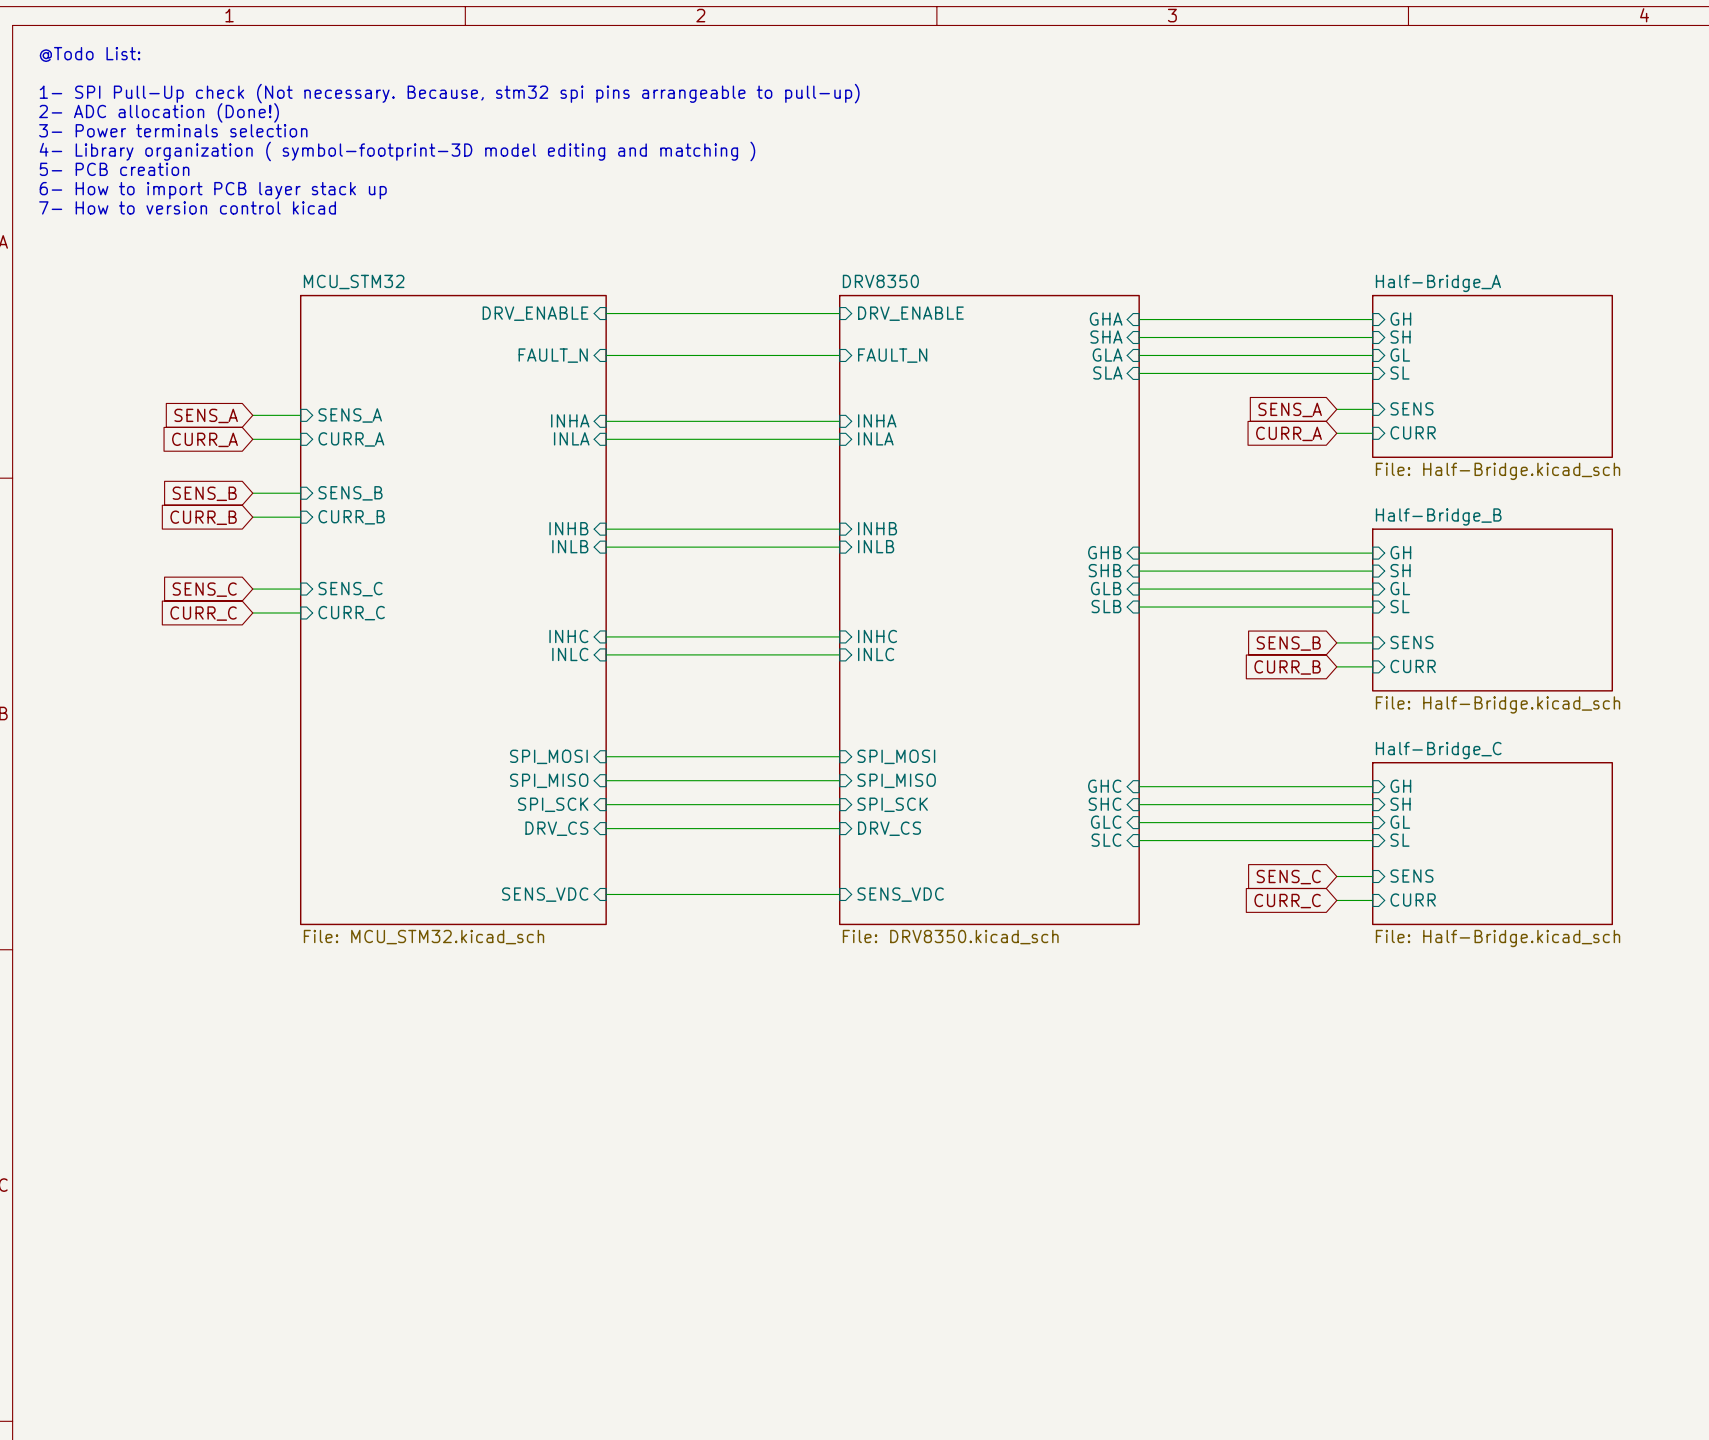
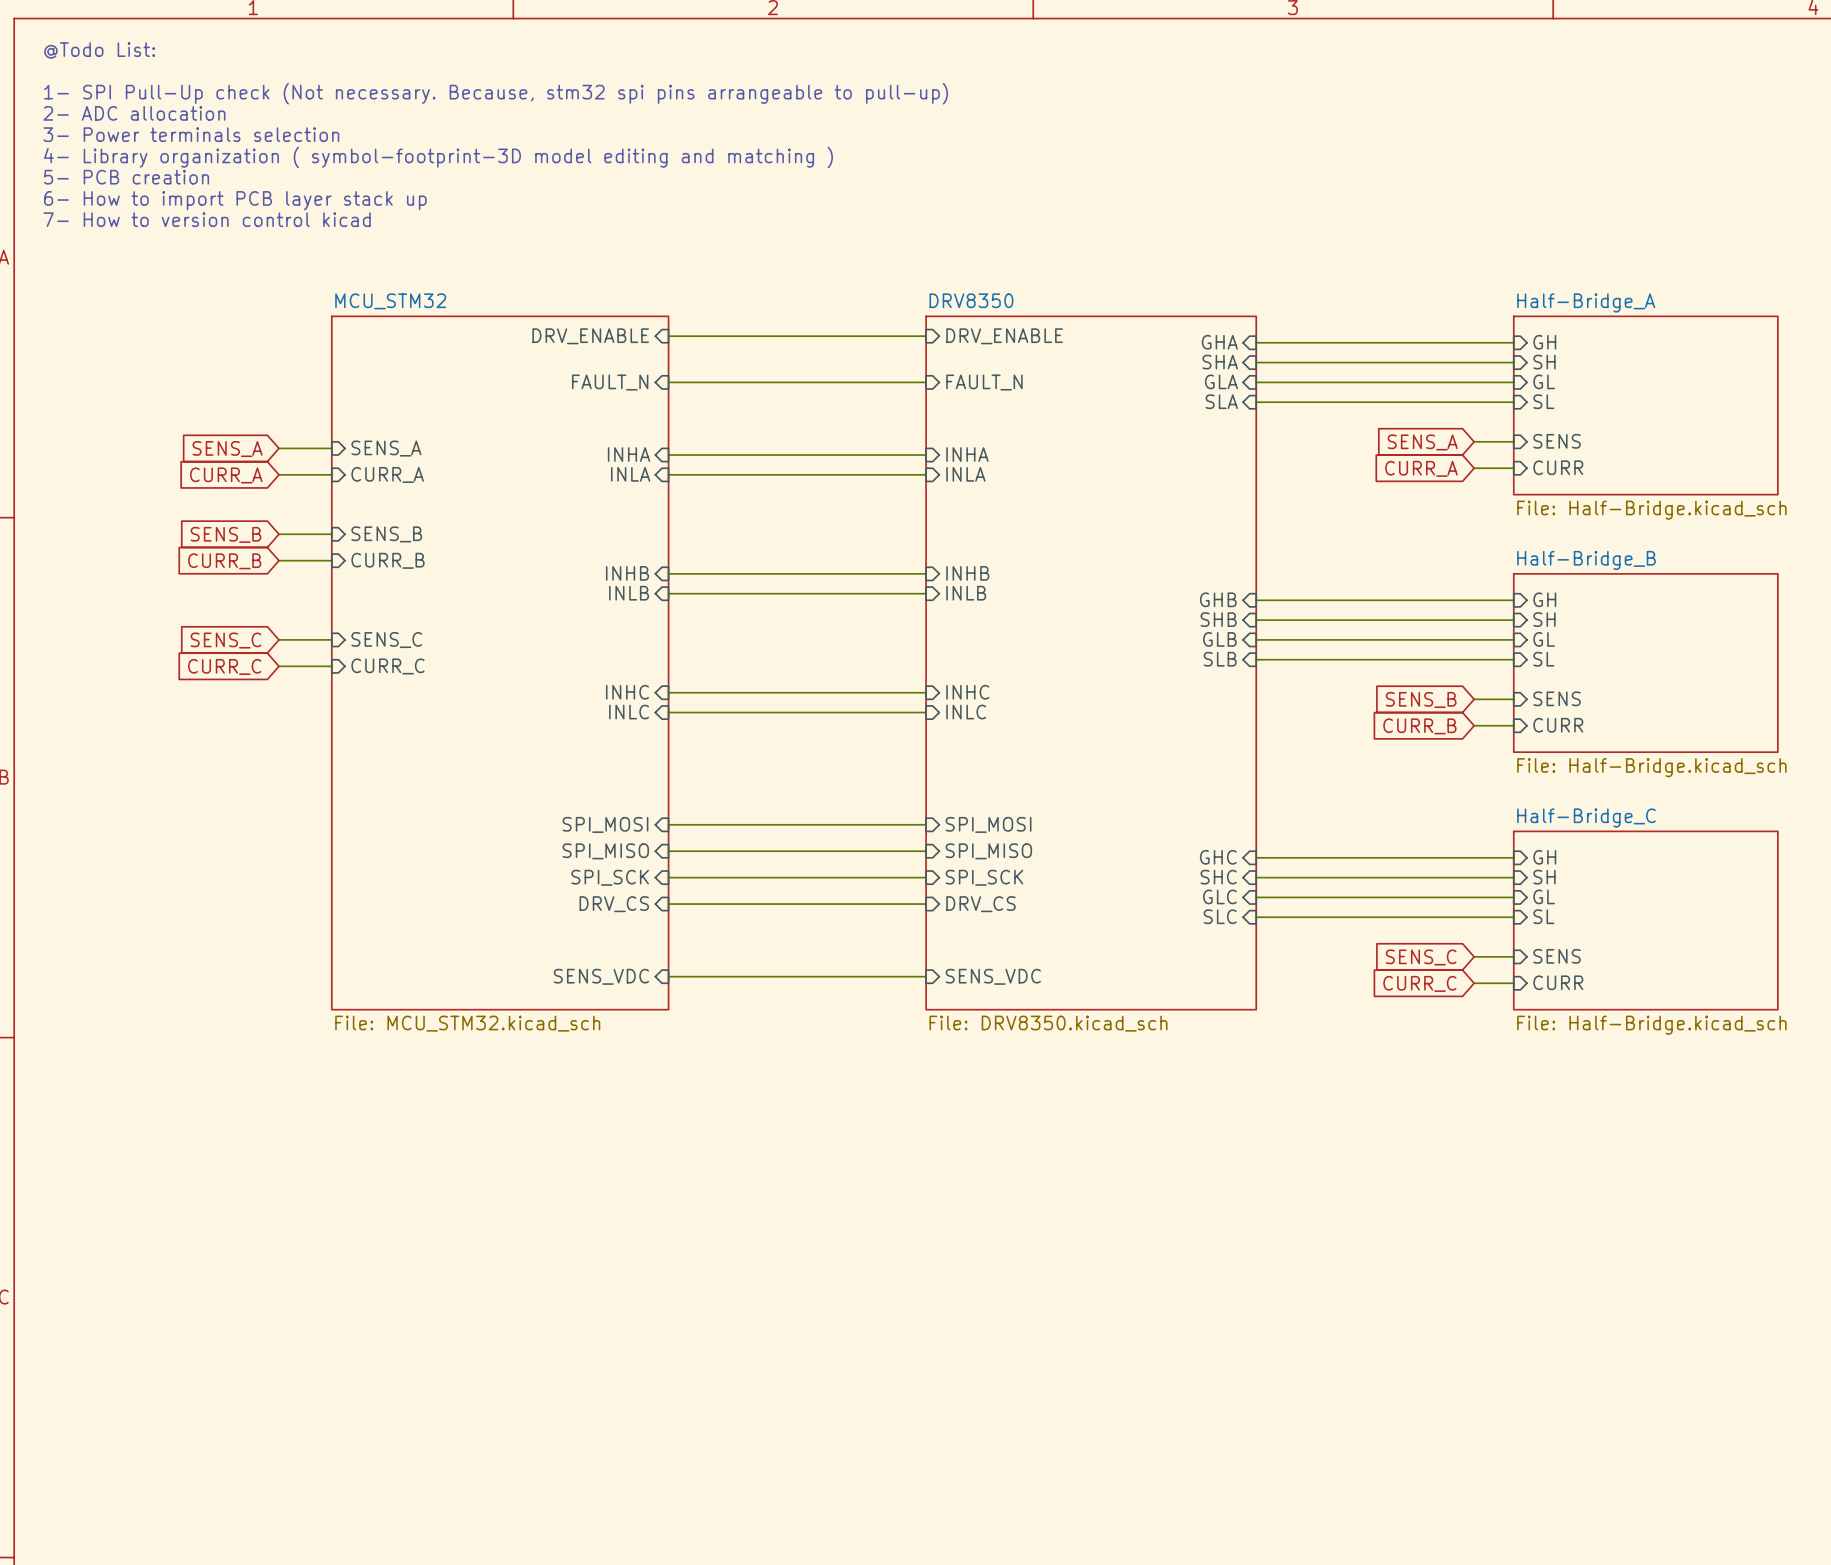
text: 2- ADC allocation (Done!) (159, 112) -> 2- ADC allocation (134, 113)

